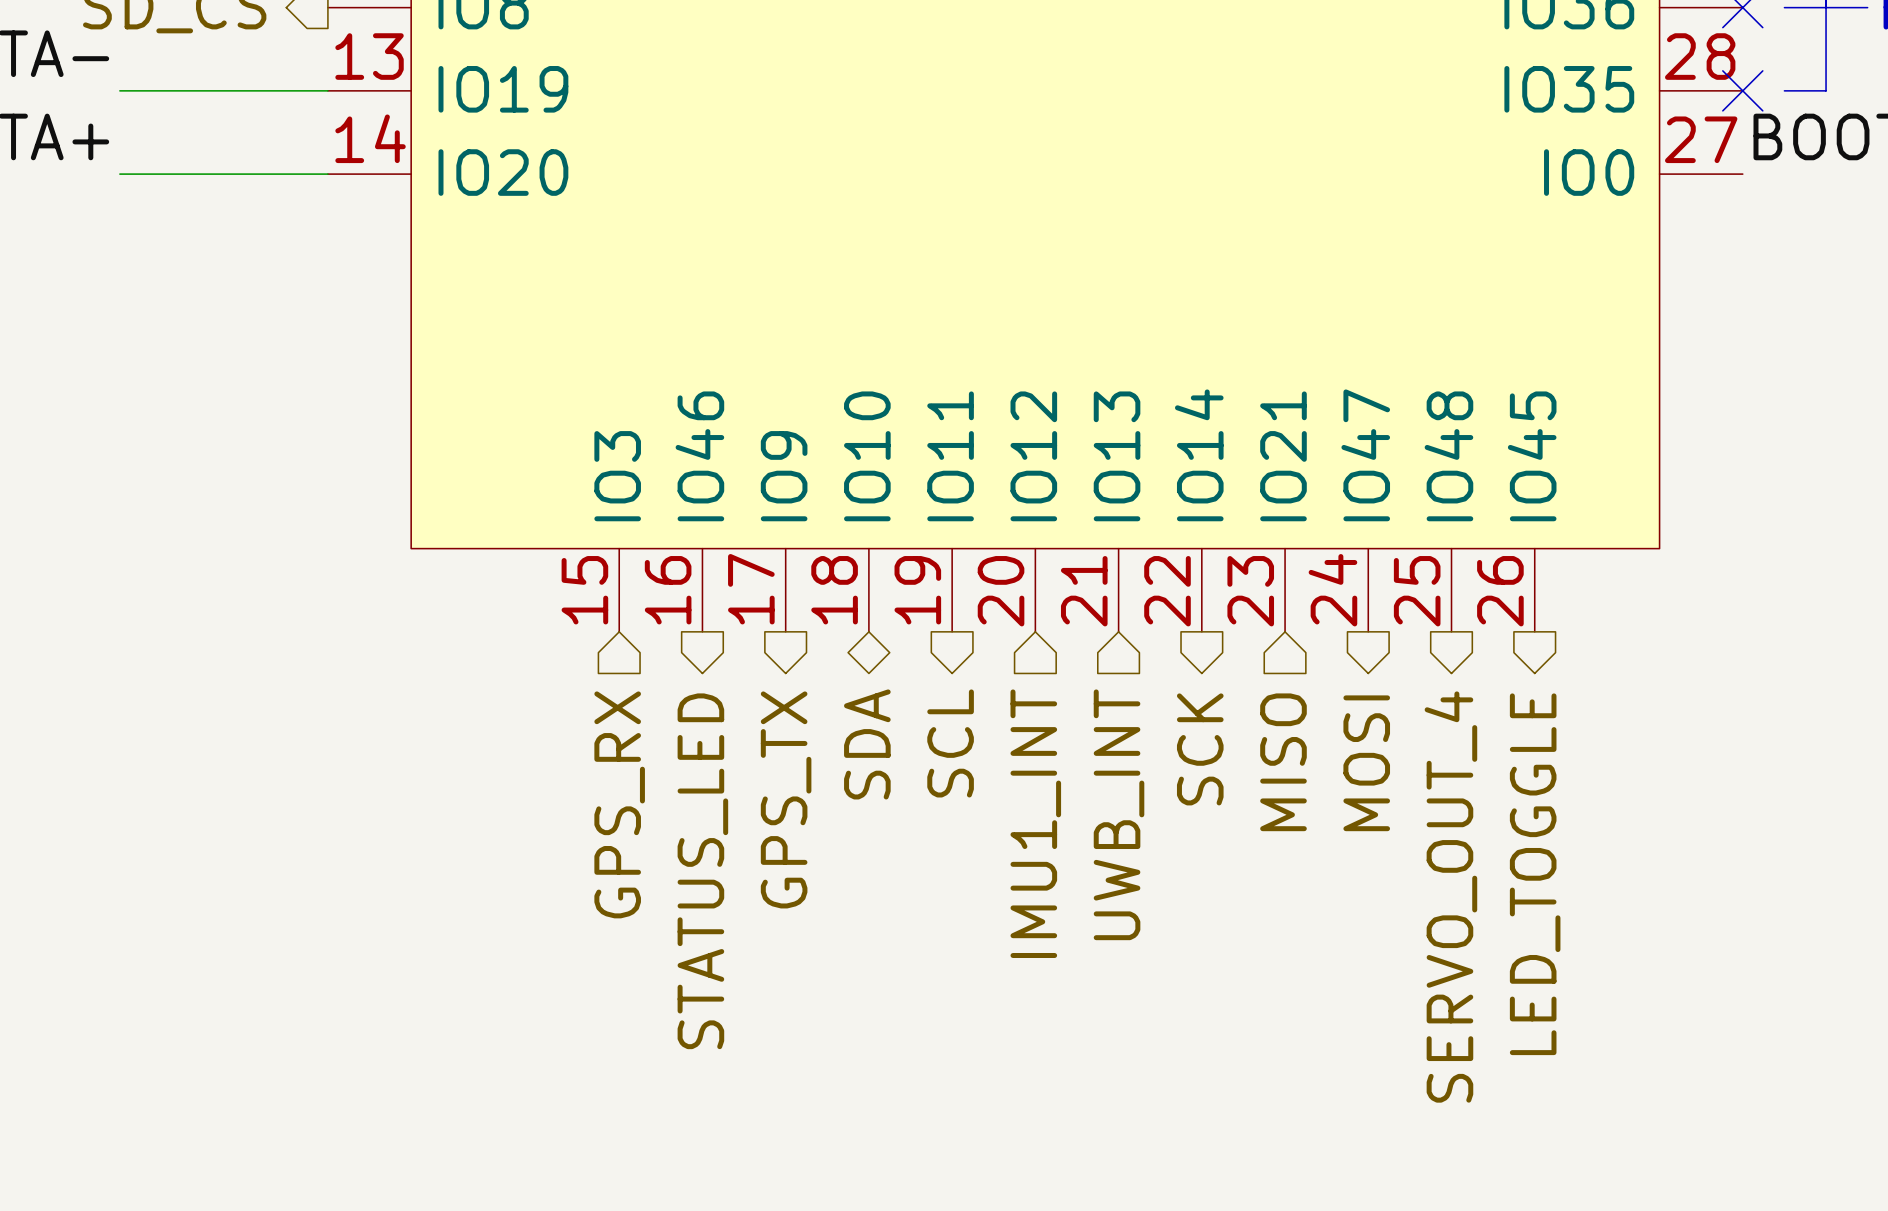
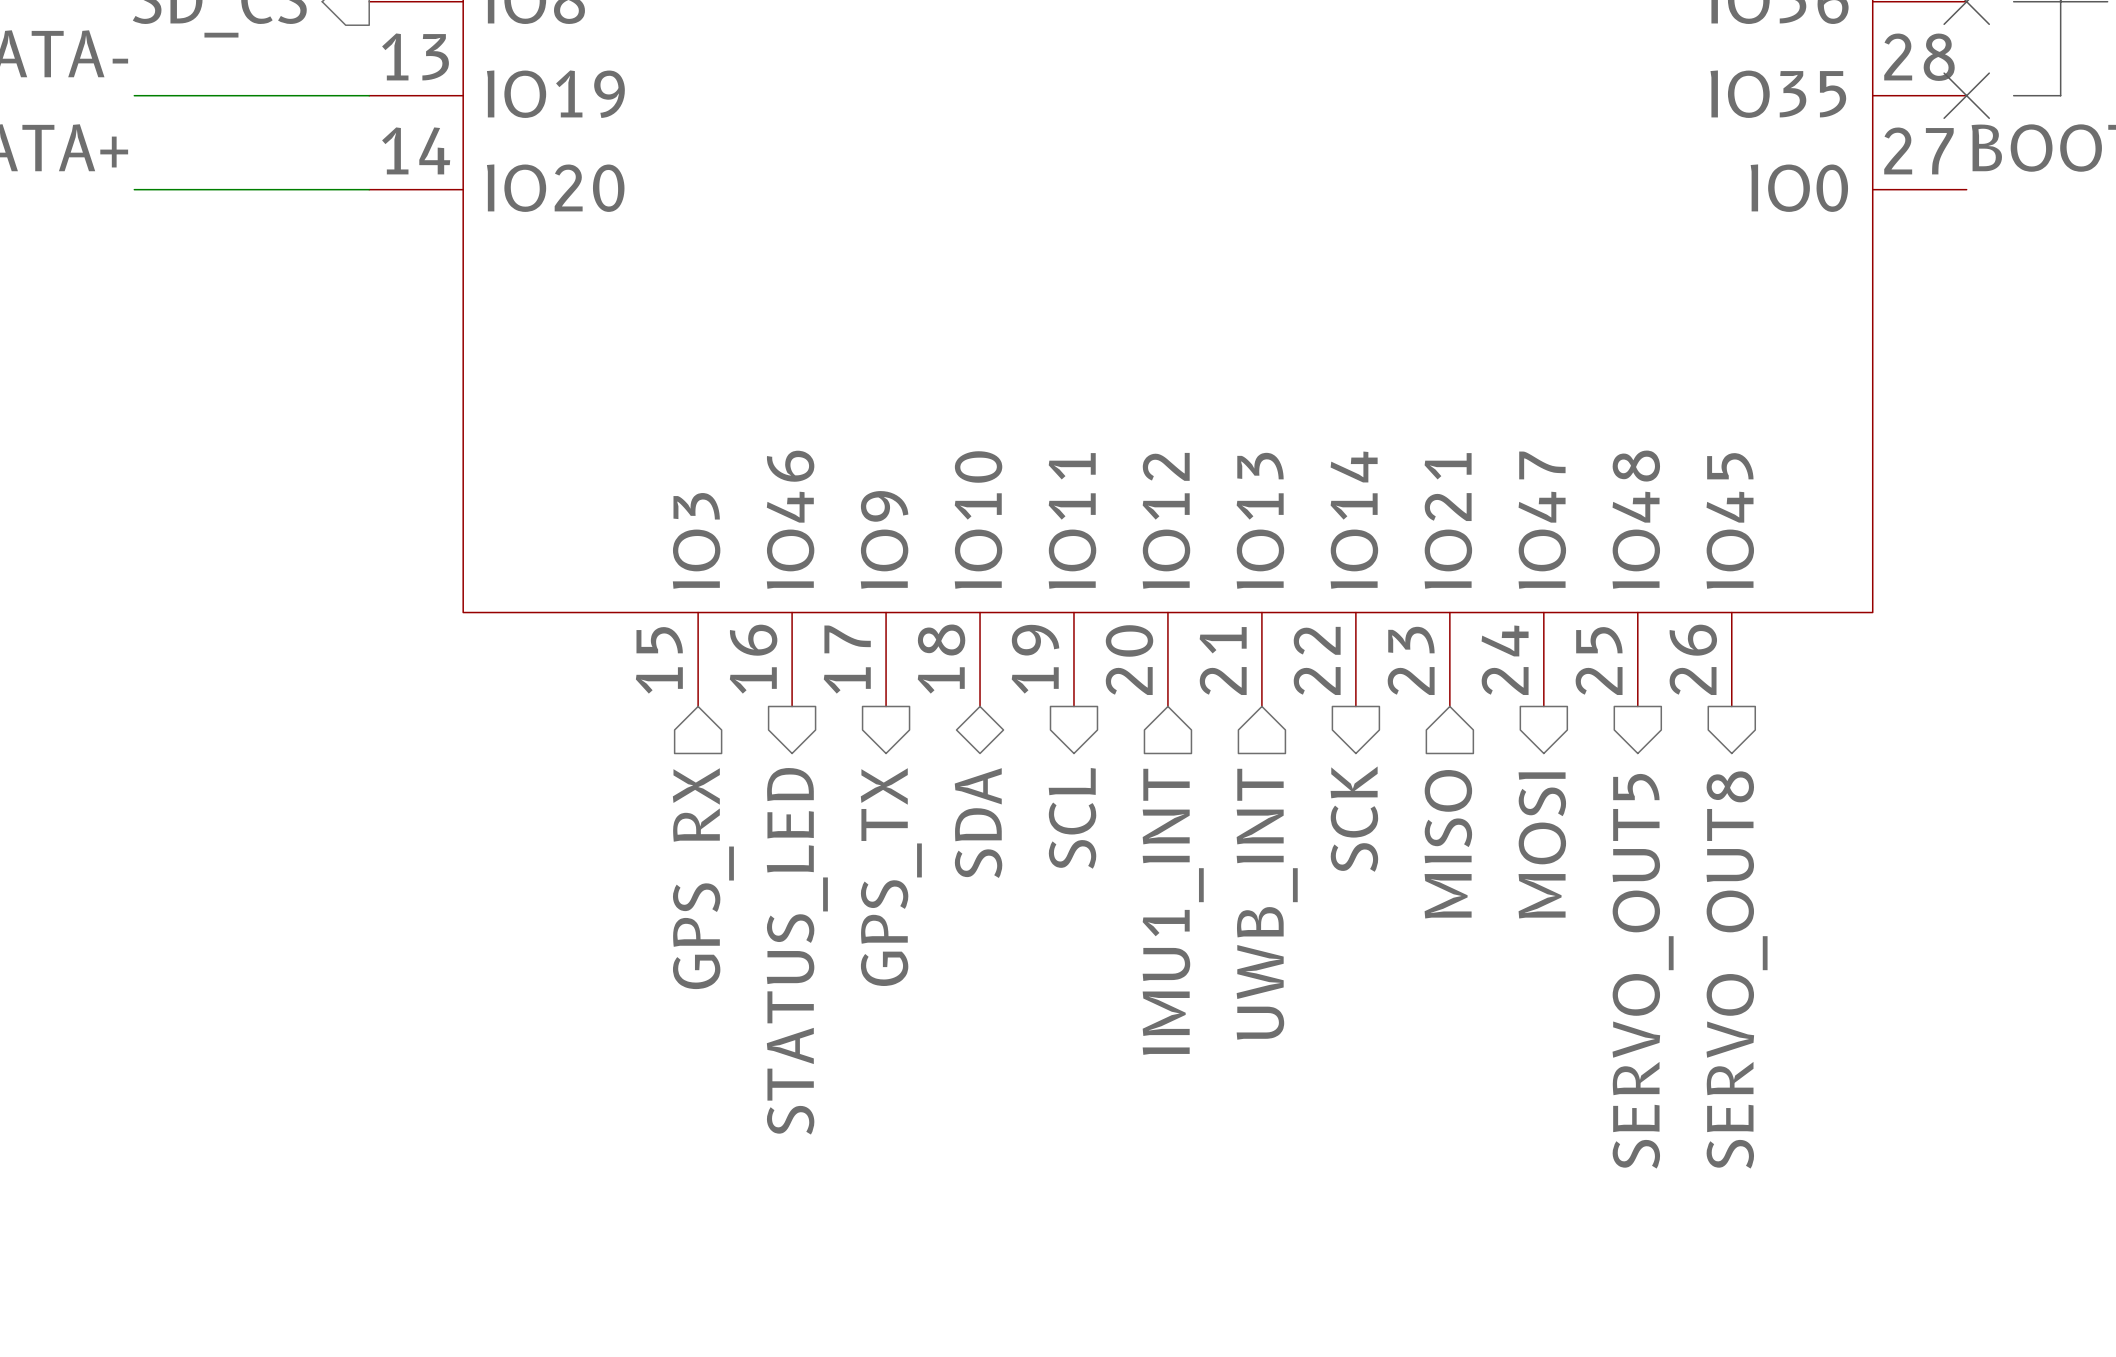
hierarchical label: LED_TOGGLE (1535, 874) -> SERVO_OUT8 (1737, 969)
hierarchical label: SERVO_OUT_4 (1450, 897) -> SERVO_OUT5 (1643, 971)

